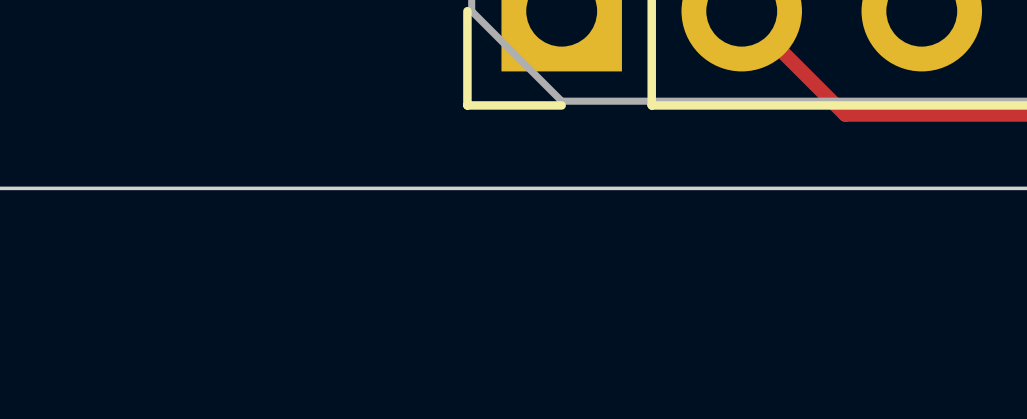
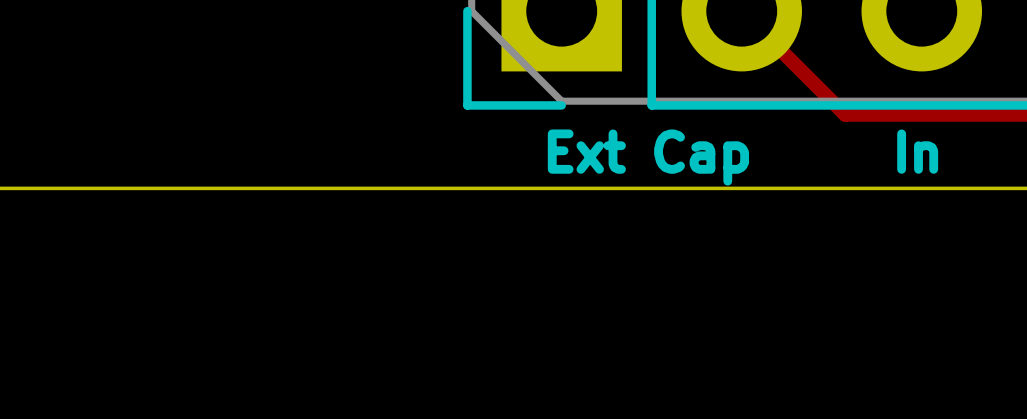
text: none -> In (917, 151)
text: none -> Ext Cap (648, 157)

